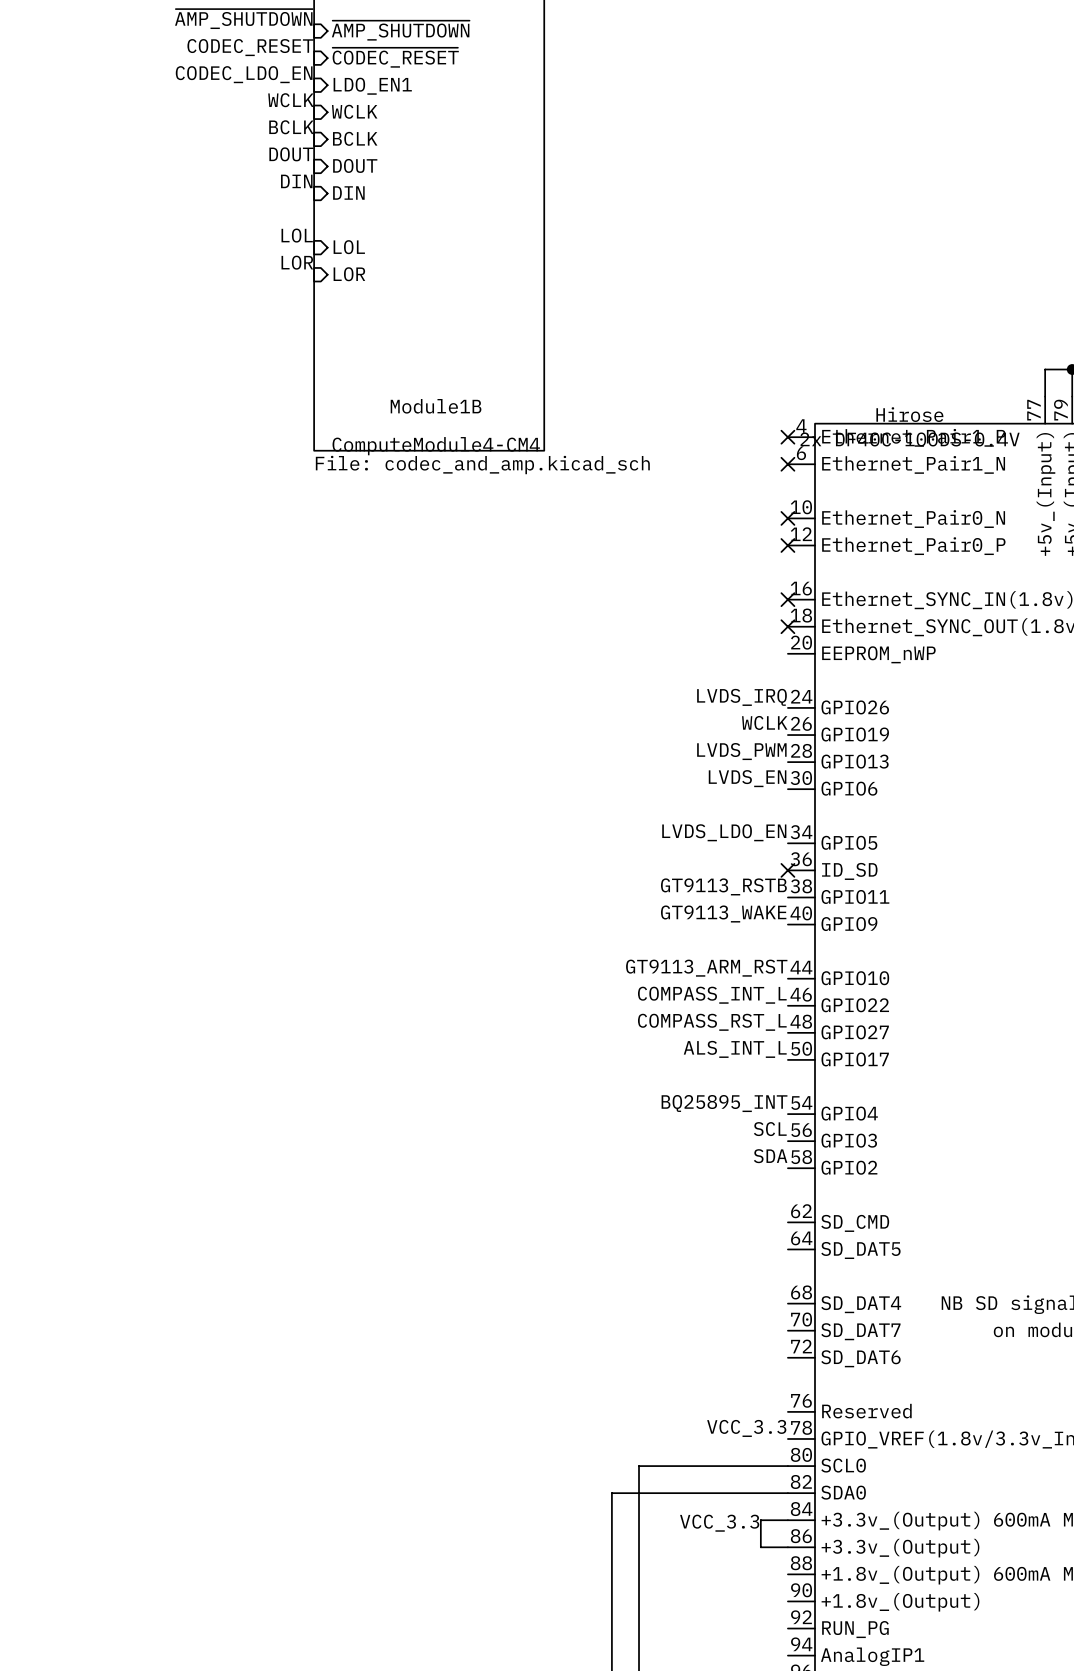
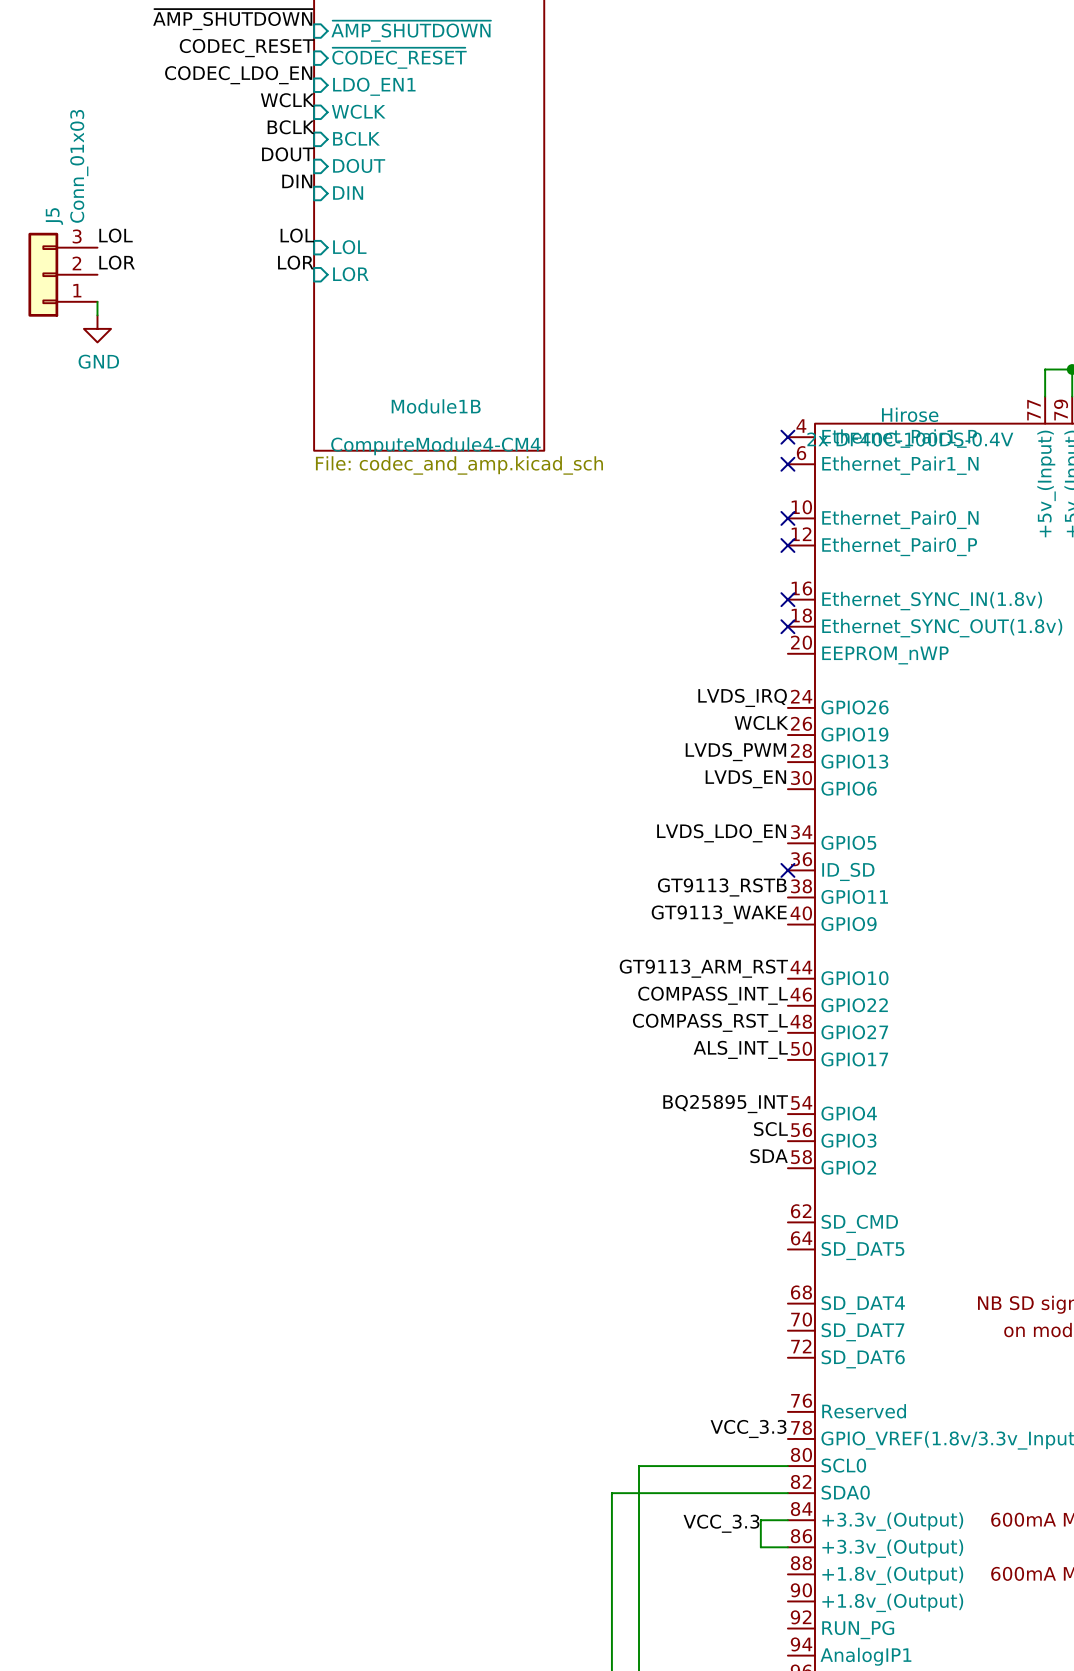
label: none -> LOL (116, 235)
label: none -> LOR (117, 262)
J5: none -> Conn_01x03 (62, 274)
wire: none -> (97, 301) (97, 315)
power symbol: none -> GND (97, 328)

